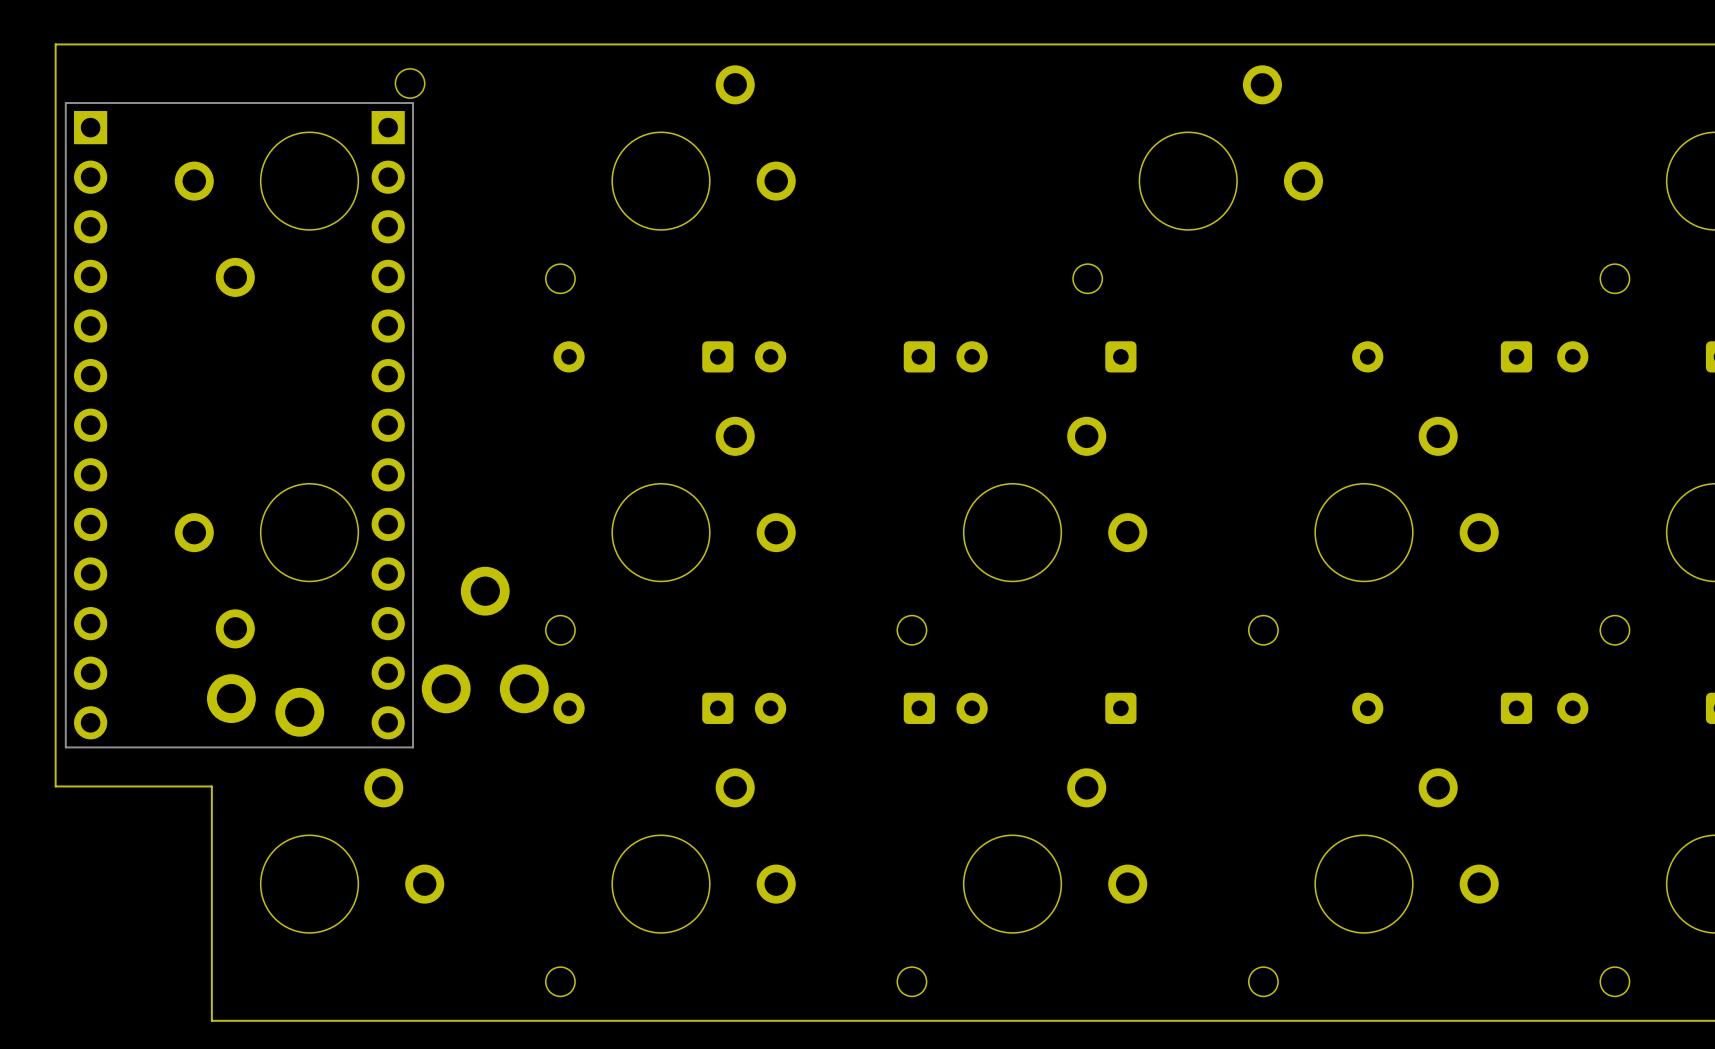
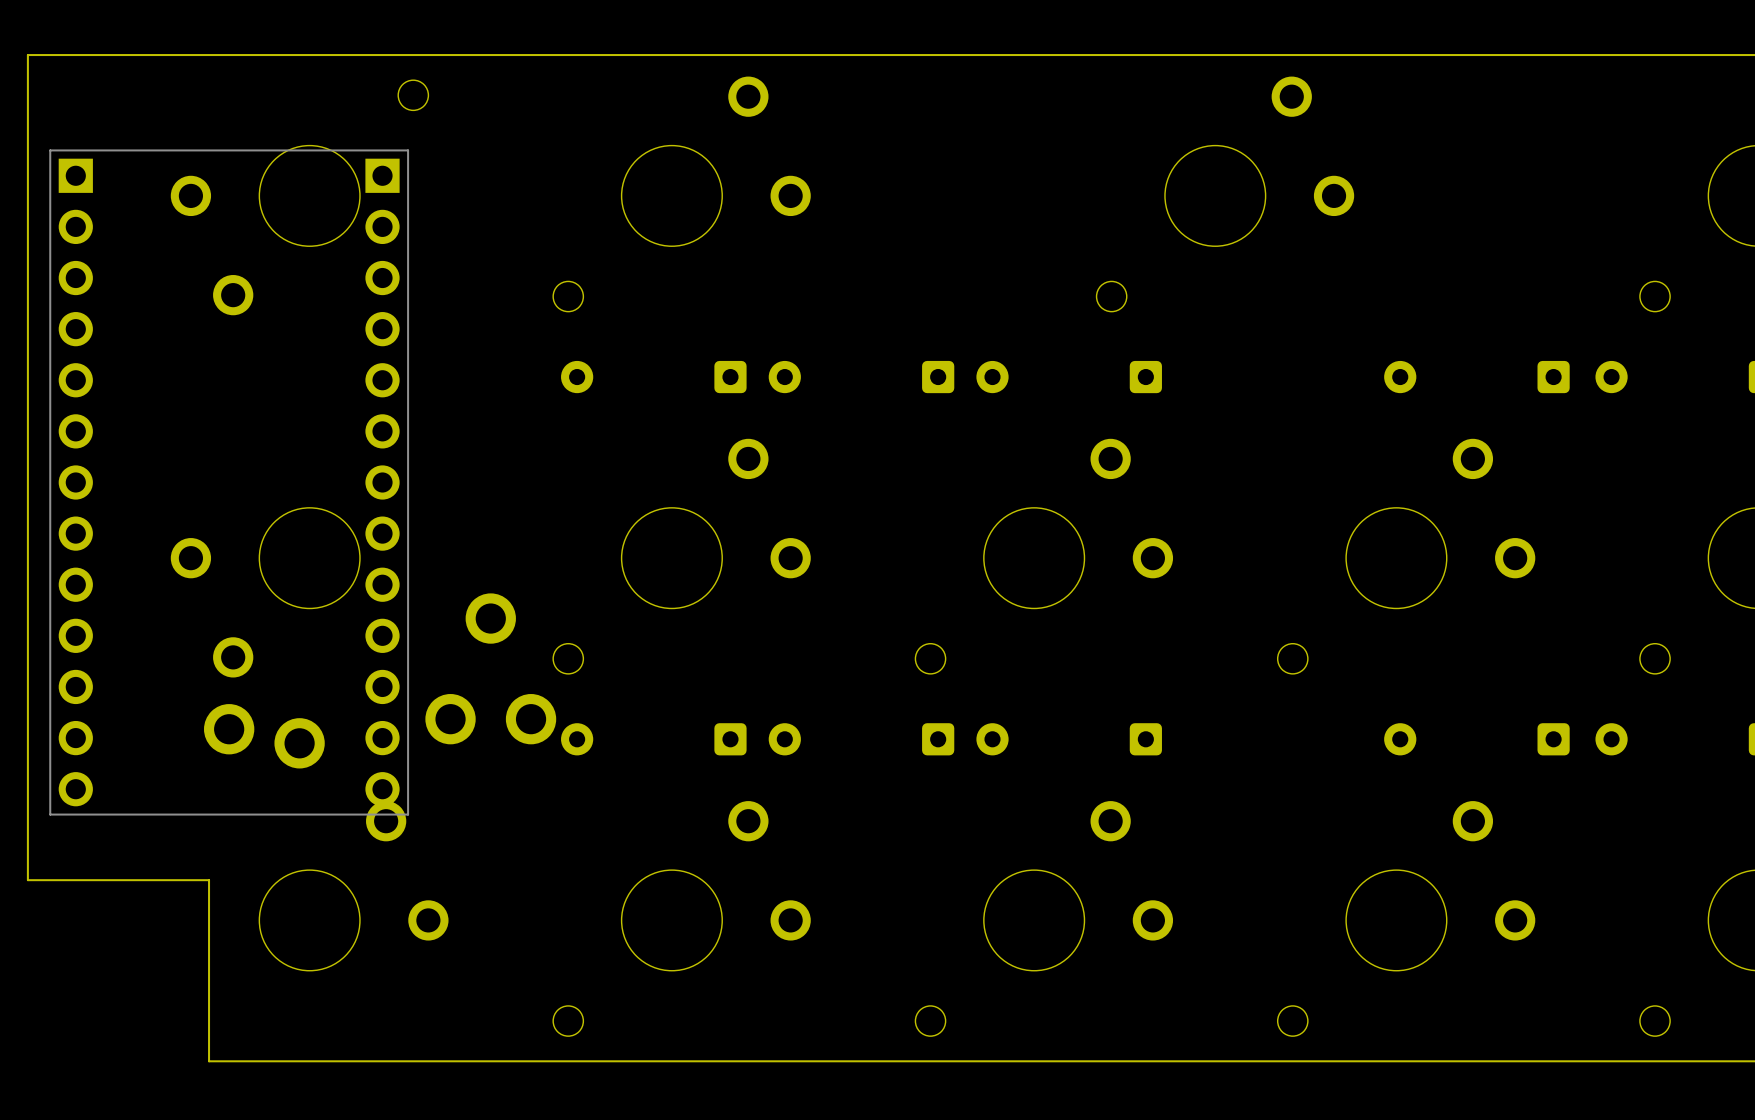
board edge: (55, 44) (55, 786) (211, 786) (211, 845) -> (48, 55) (27, 55) (27, 880) (209, 880)
line: (413, 103) (413, 747) (65, 747) (65, 103) (413, 103) -> (408, 150) (408, 814) (50, 814) (50, 150) (408, 150)
part position: (90, 425) -> (75, 482)
part position: (388, 425) -> (382, 482)

